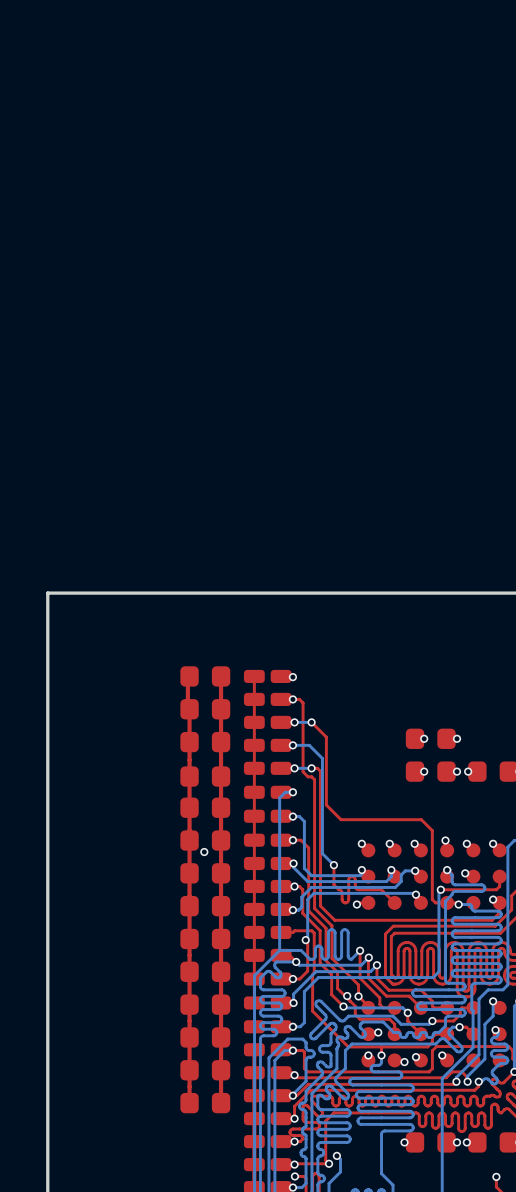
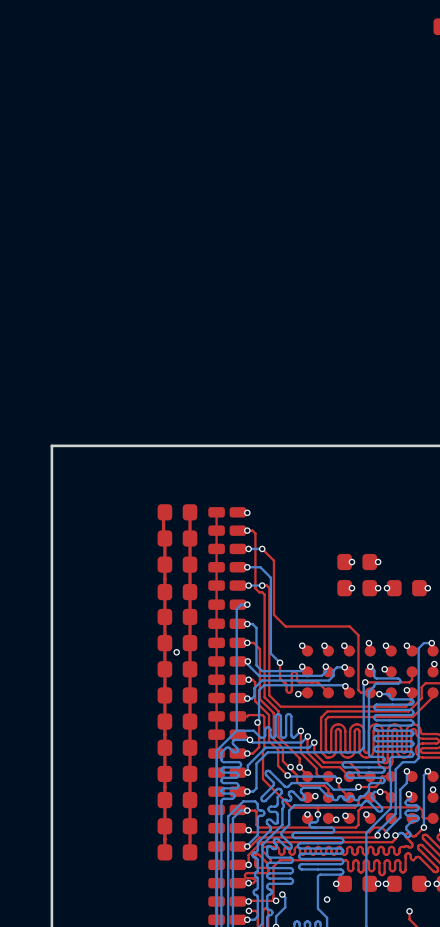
via: none -> (327, 899)

